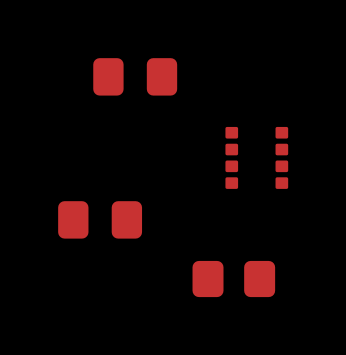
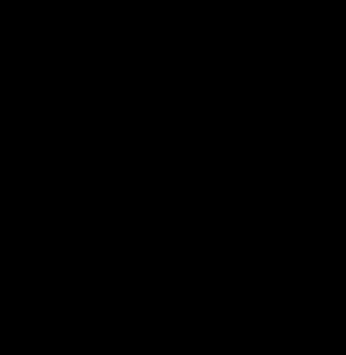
part: (135, 76) -> none
part: (256, 157) -> none
part: (100, 219) -> none
part: (233, 279) -> none

